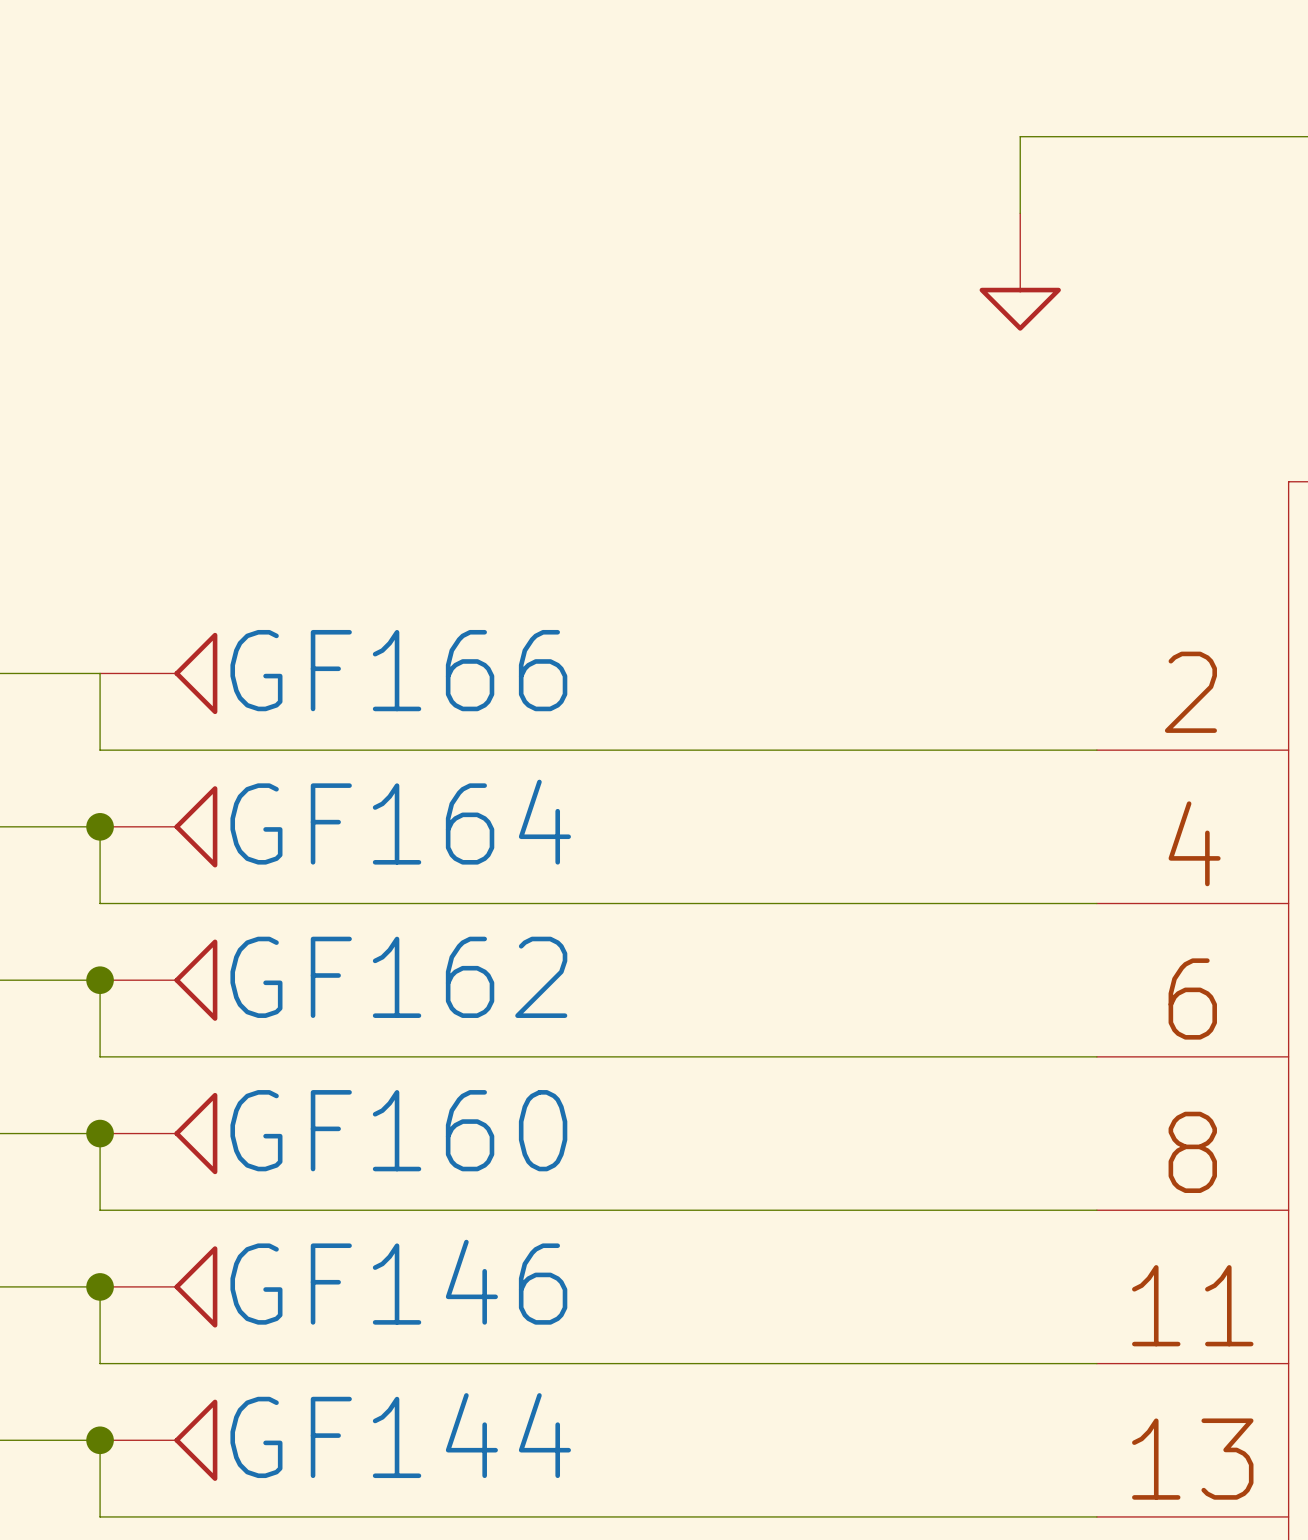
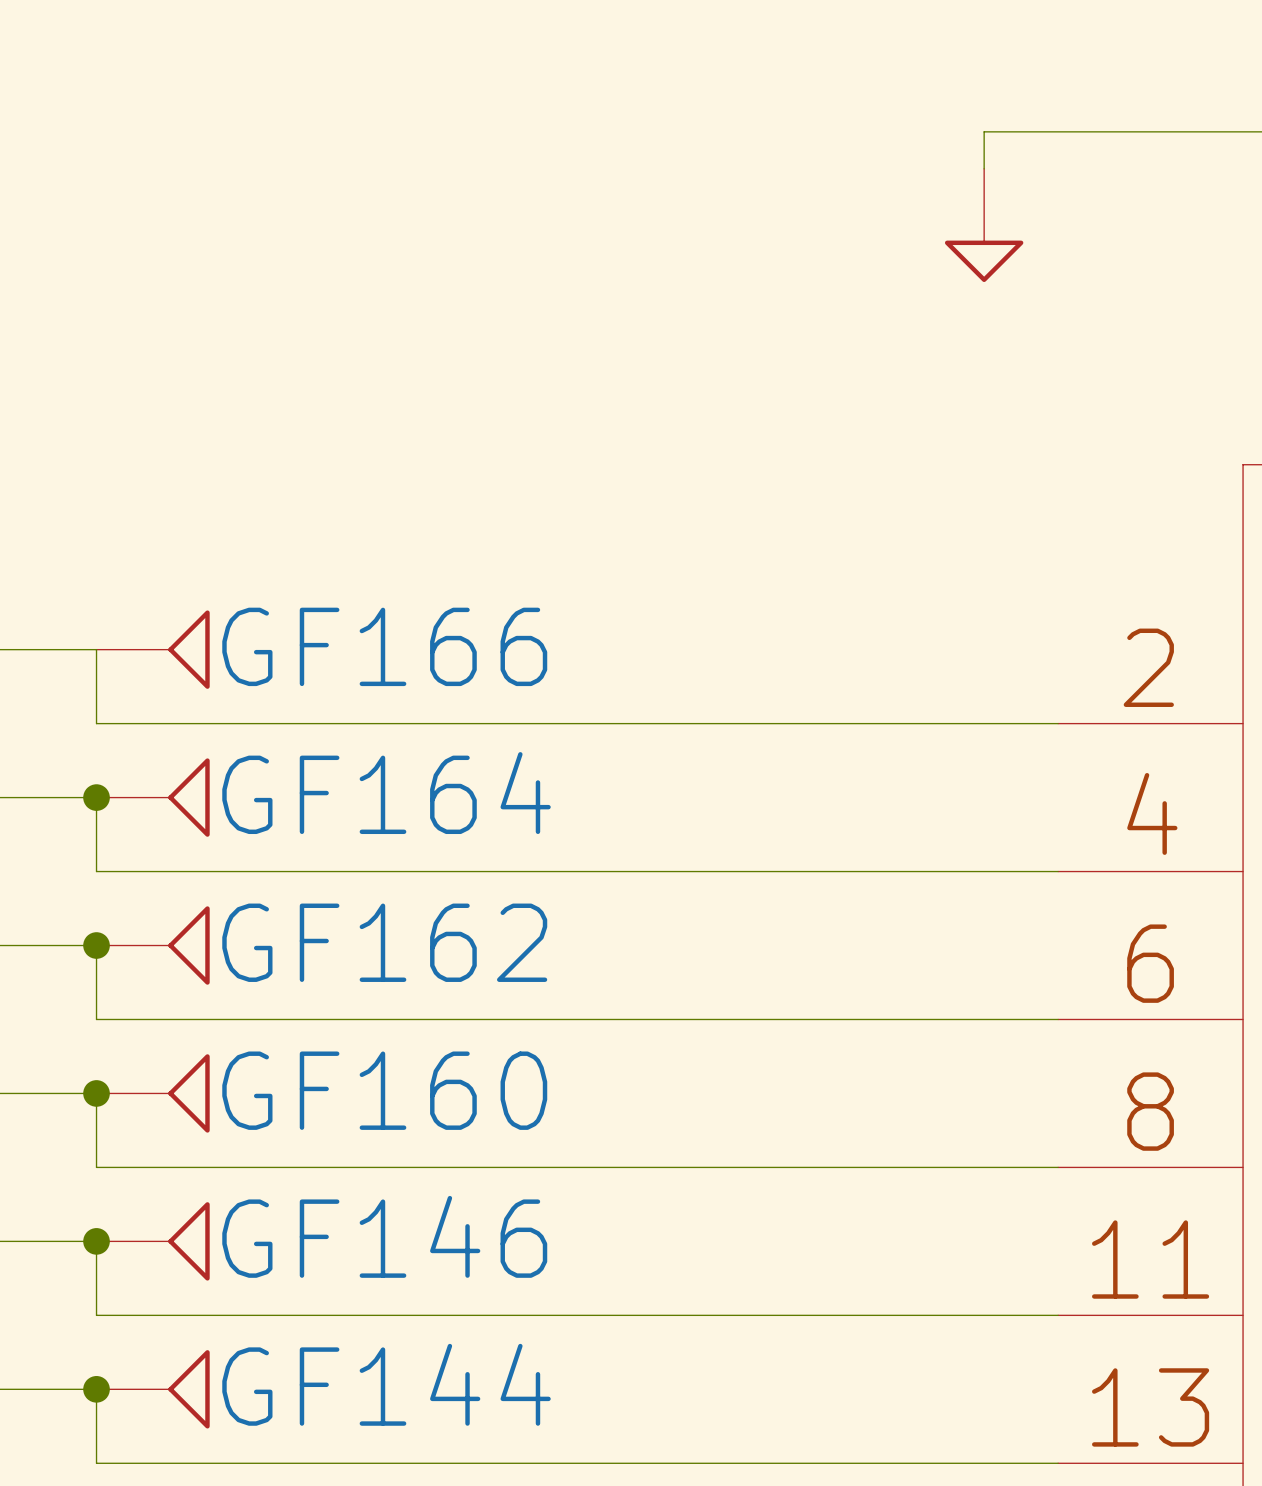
power symbol position: (1020, 272) -> (984, 225)

